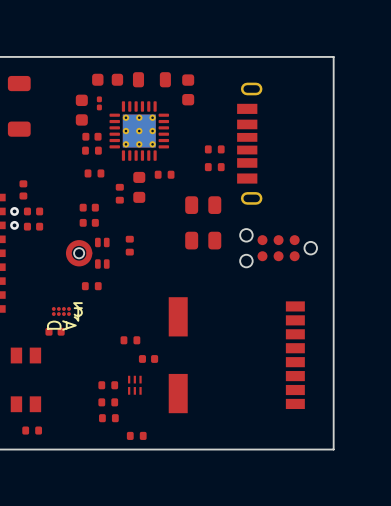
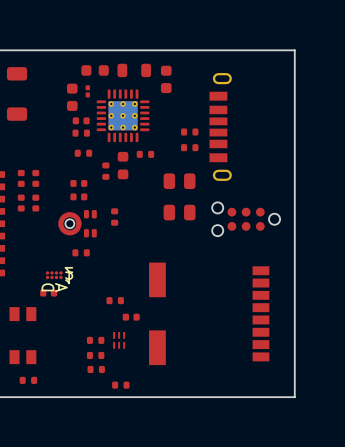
part: (23, 189) -> none
part: none -> (21, 178)
part: none -> (35, 178)
via: (14, 211) -> none
part: (33, 211) -> none
via: (14, 225) -> none
part: (33, 226) -> none
part: none -> (21, 203)
part: none -> (35, 203)

